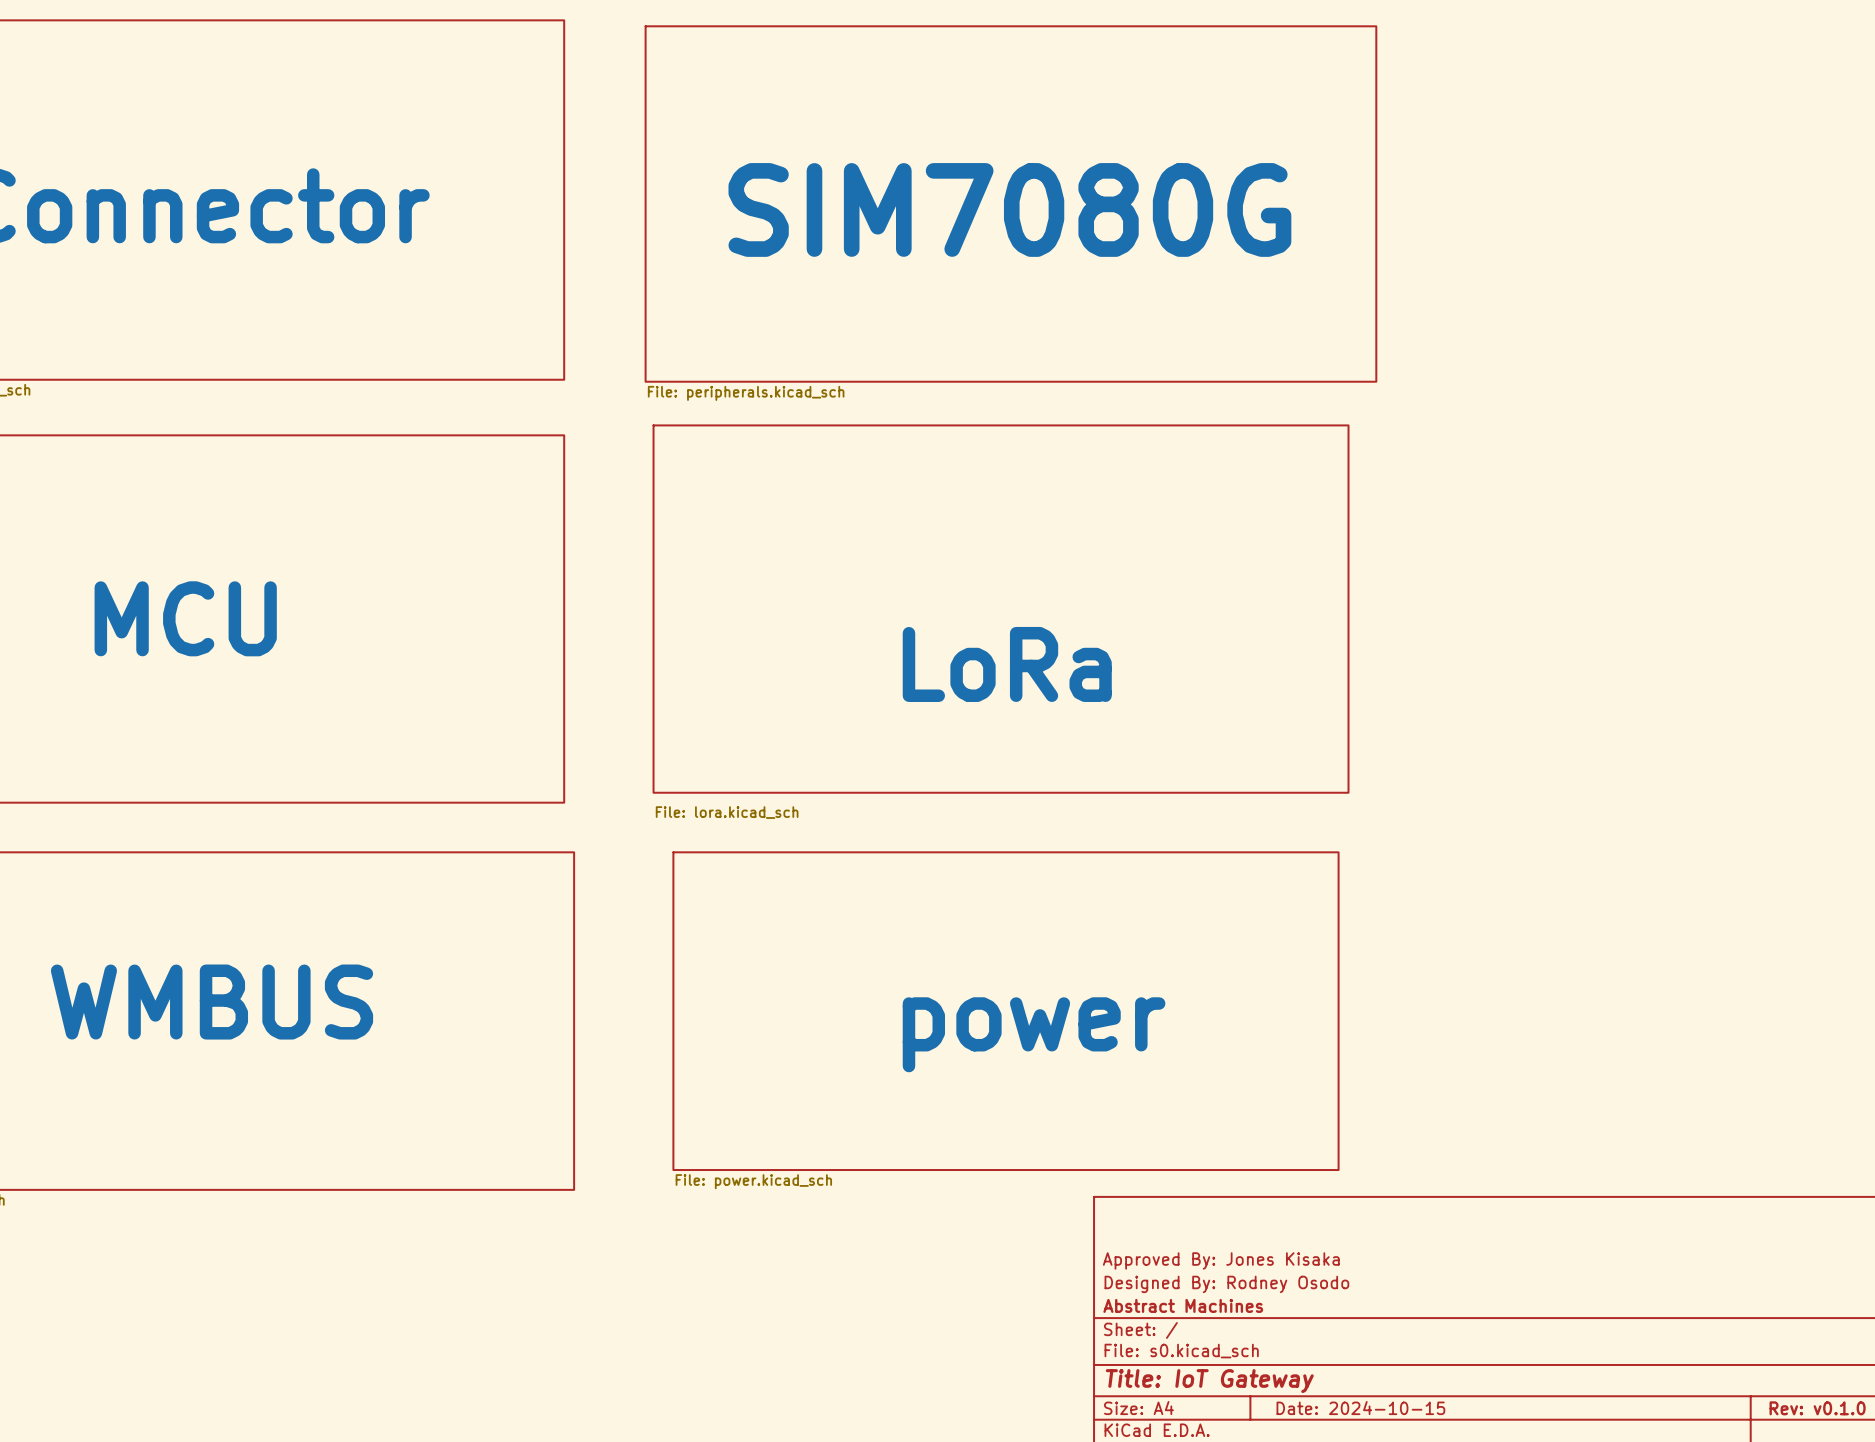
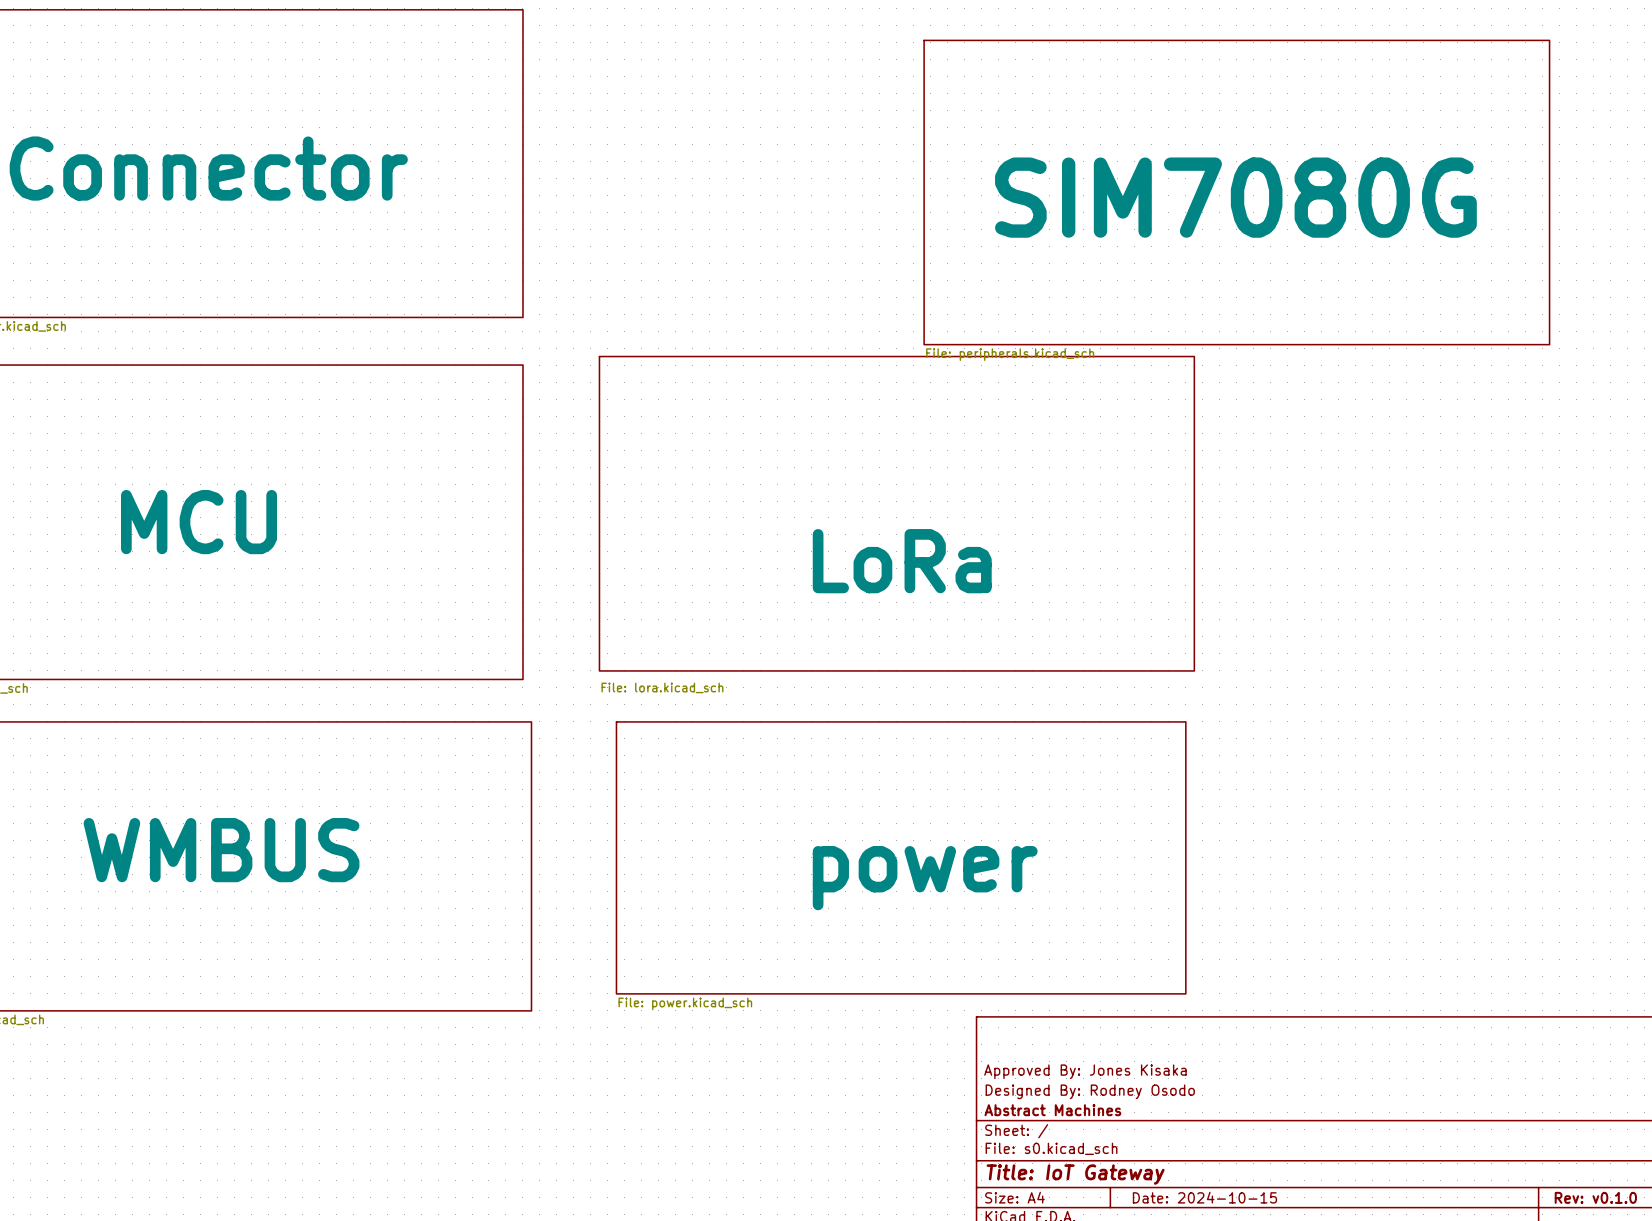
sheet SIM7080G position: (1010, 204) -> (1236, 192)

